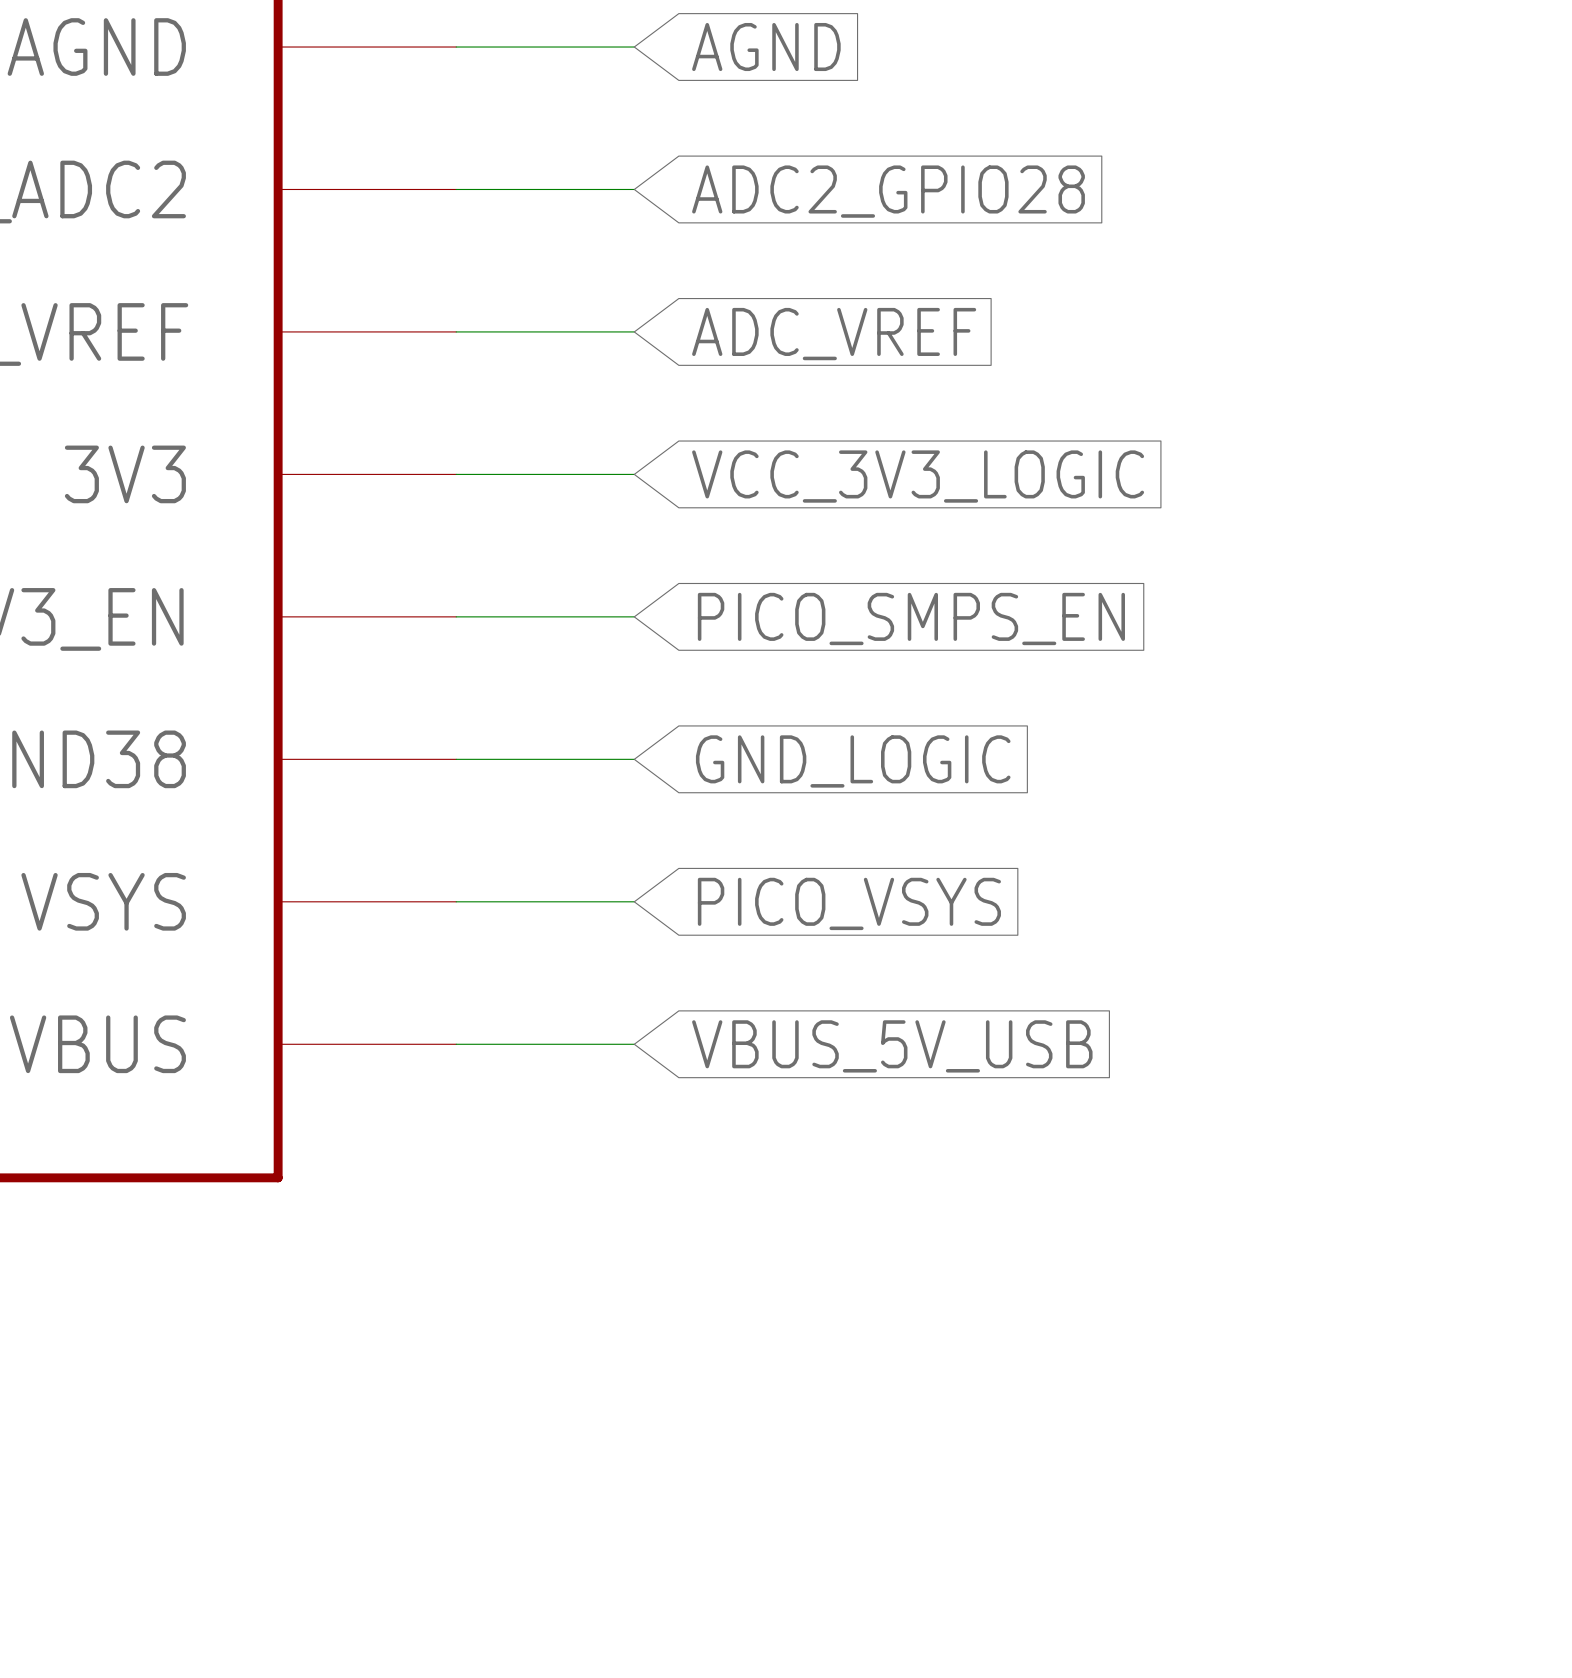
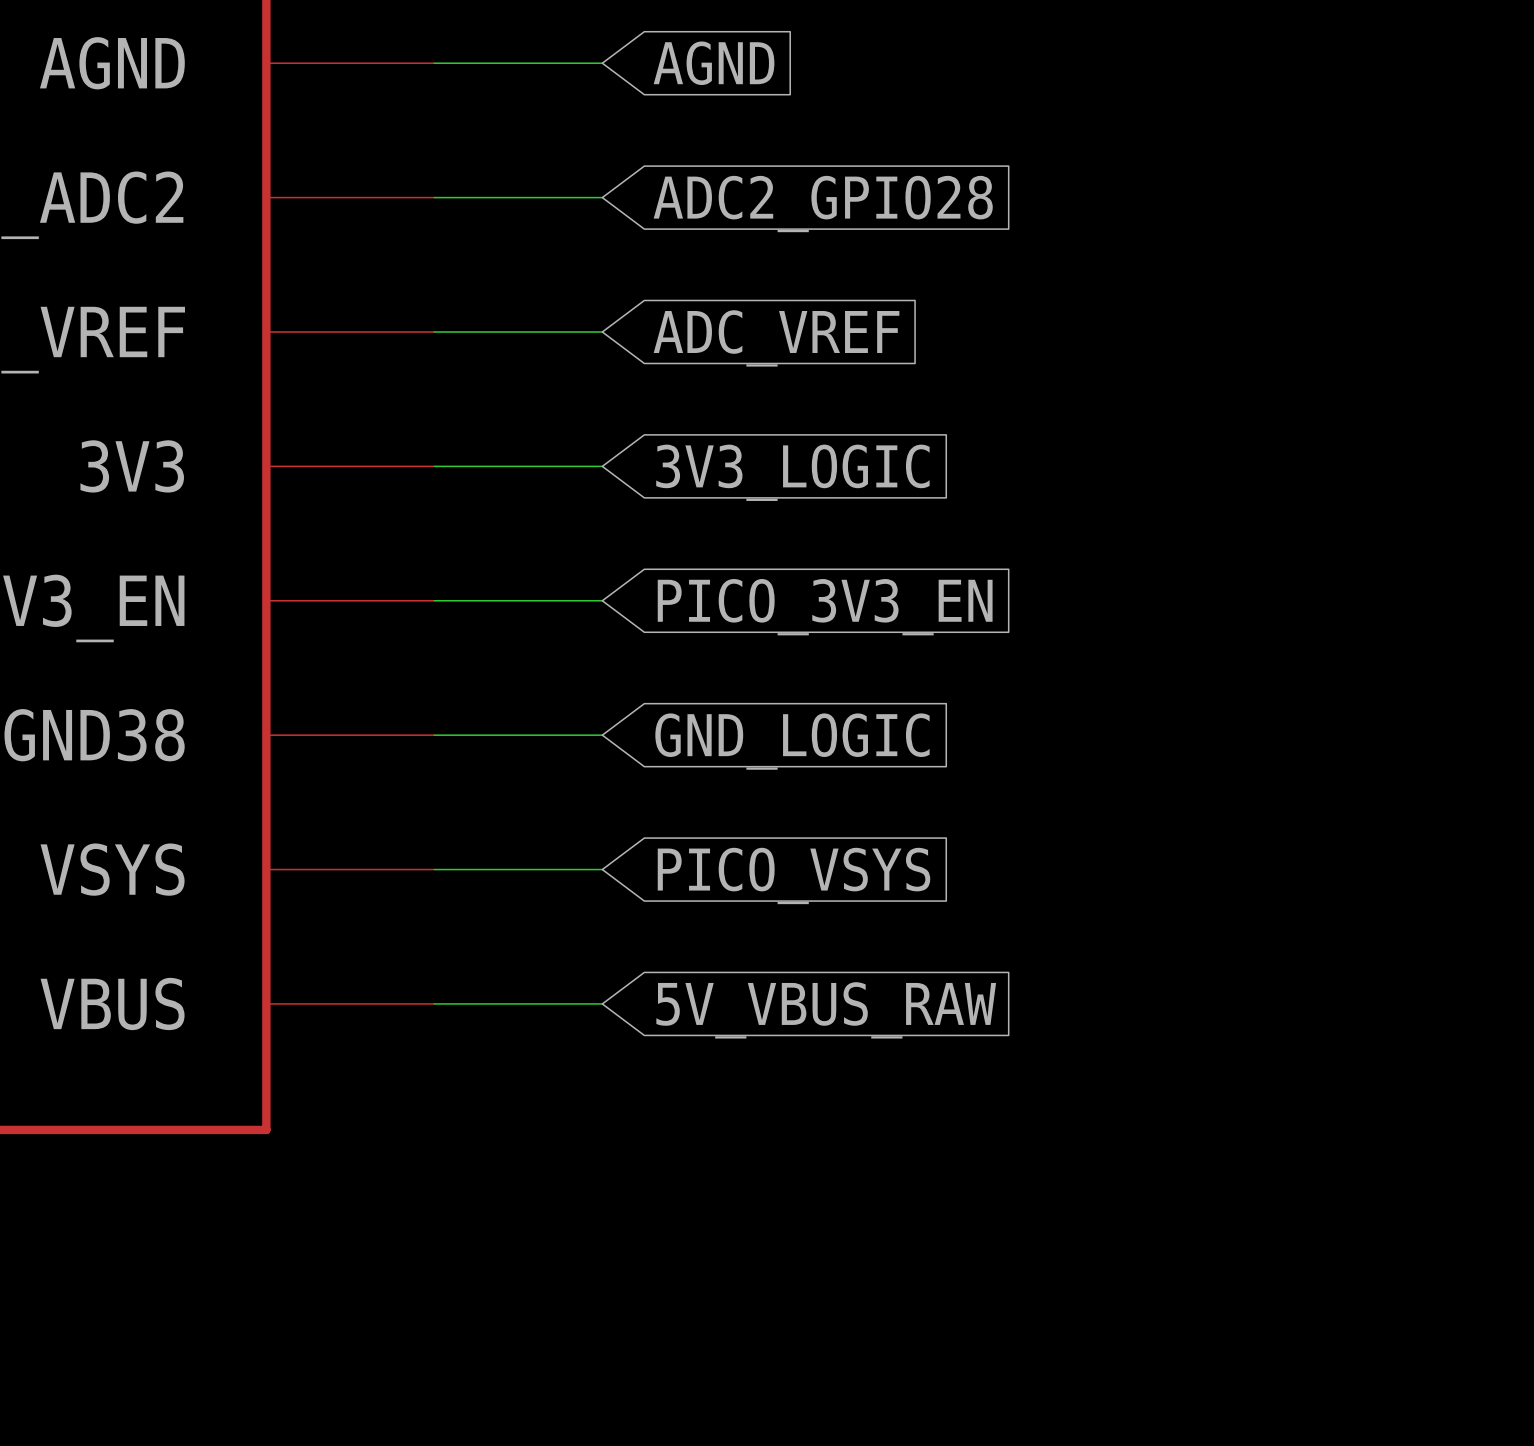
global label: VCC_3V3_LOGIC (918, 476) -> 3V3_LOGIC (792, 472)
global label: PICO_SMPS_EN (911, 619) -> PICO_3V3_EN (825, 607)
global label: VBUS_5V_USB (892, 1046) -> 5V_VBUS_RAW (826, 1010)

